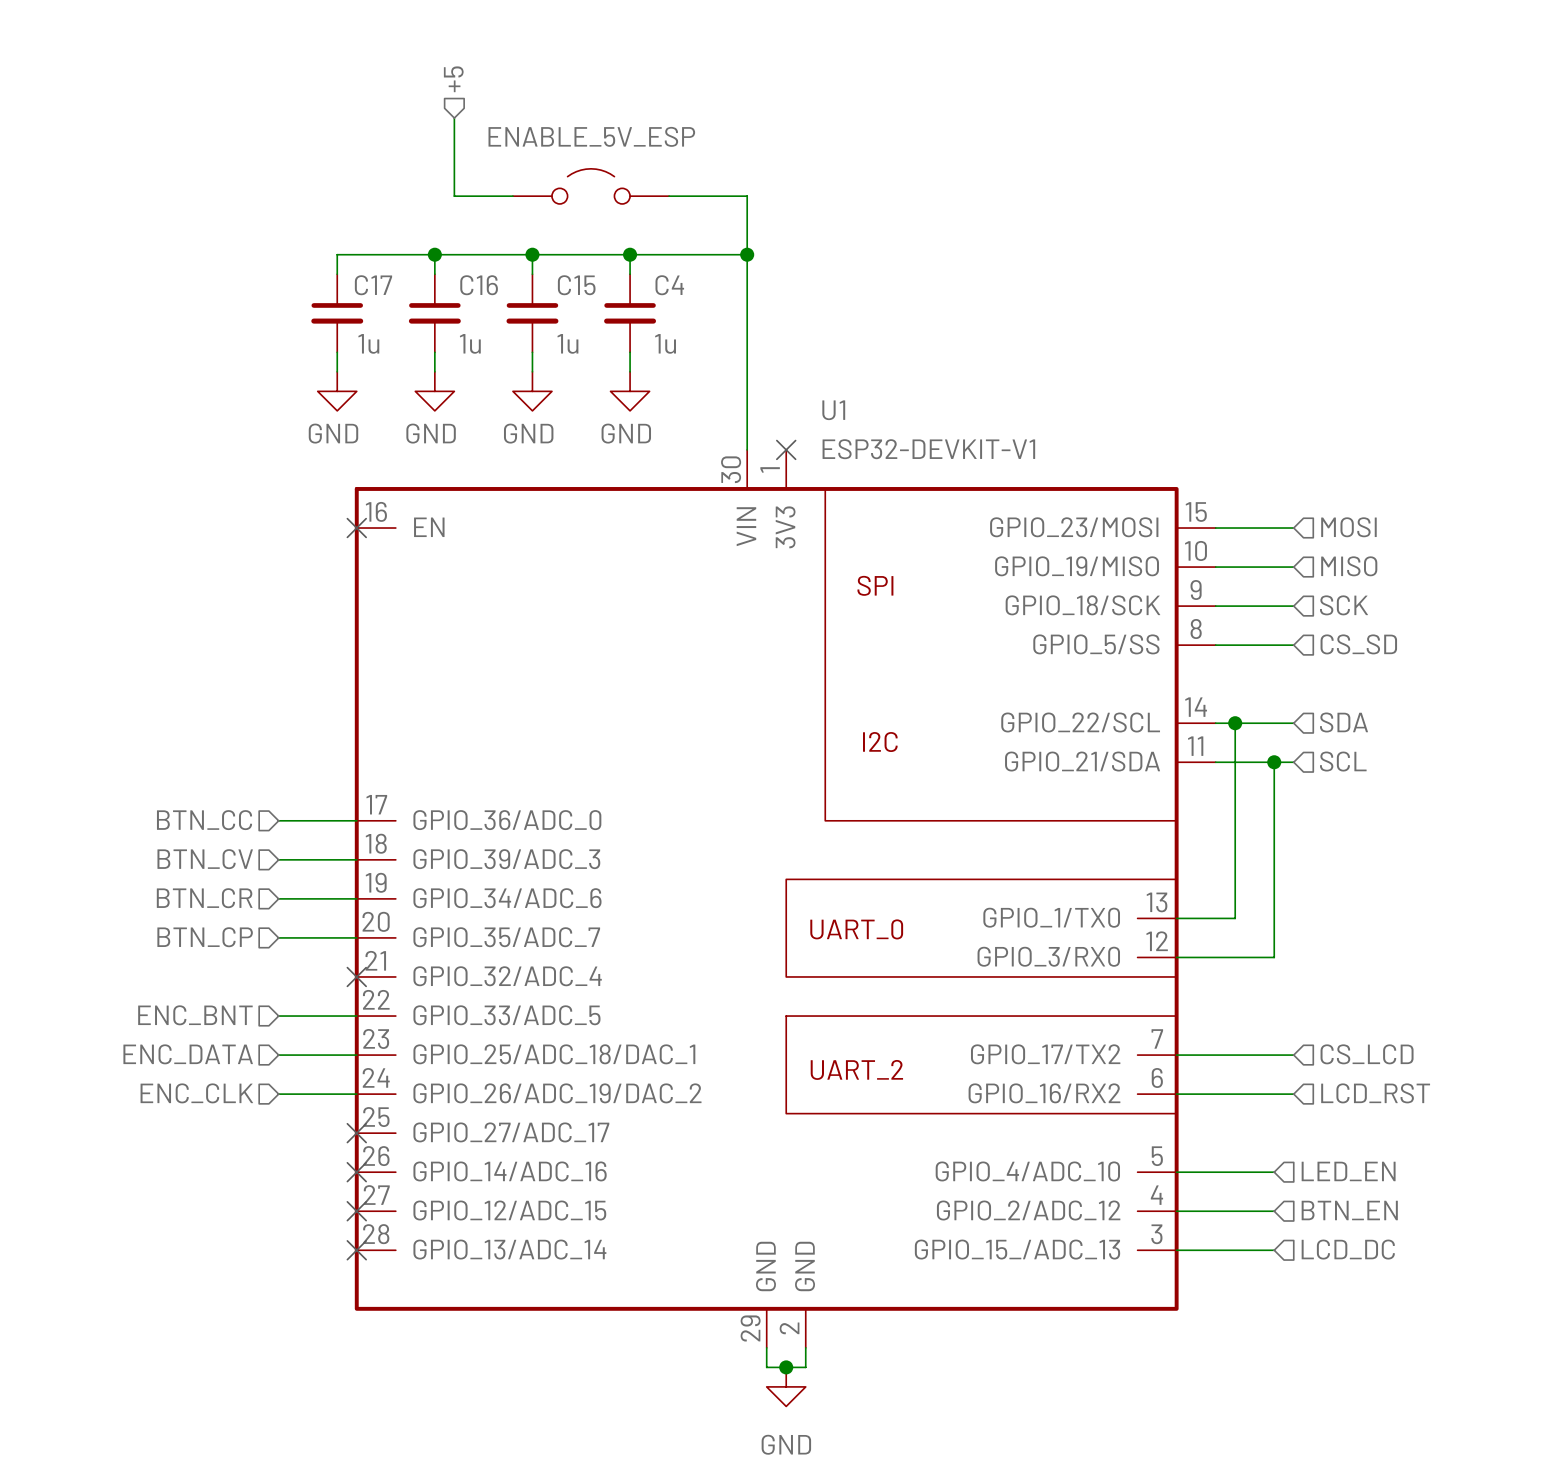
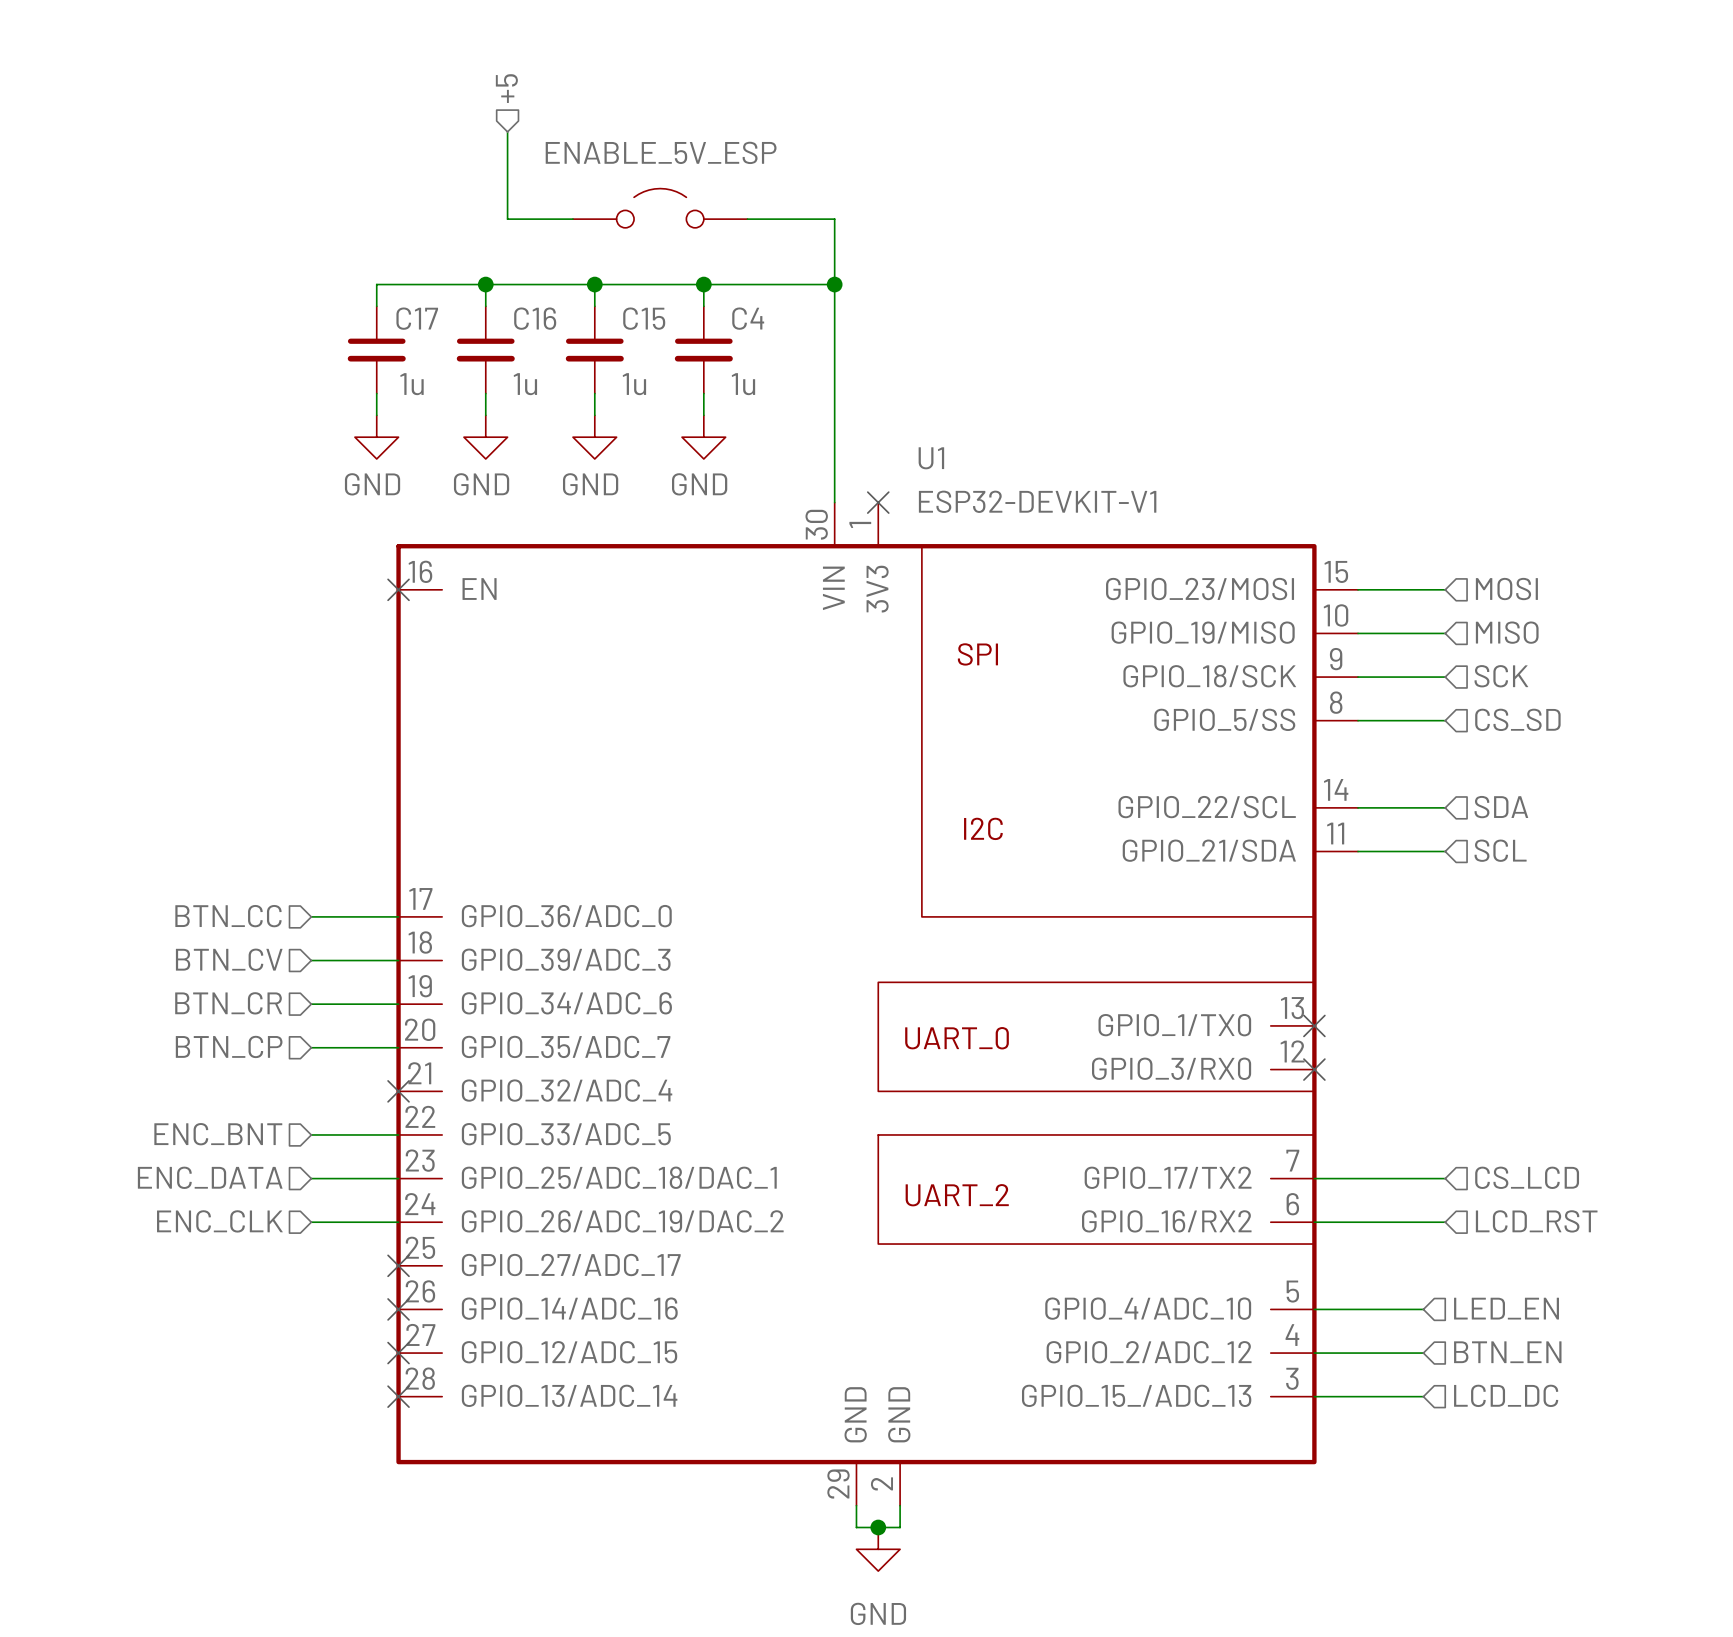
wire: (1235, 723) (1235, 918) (1176, 918) -> none
junction: (1235, 723) -> none
wire: (1274, 762) (1274, 957) (1176, 957) -> none
junction: (1274, 762) -> none
no-connect mark: none -> (1314, 1025)
no-connect mark: none -> (1314, 1069)

